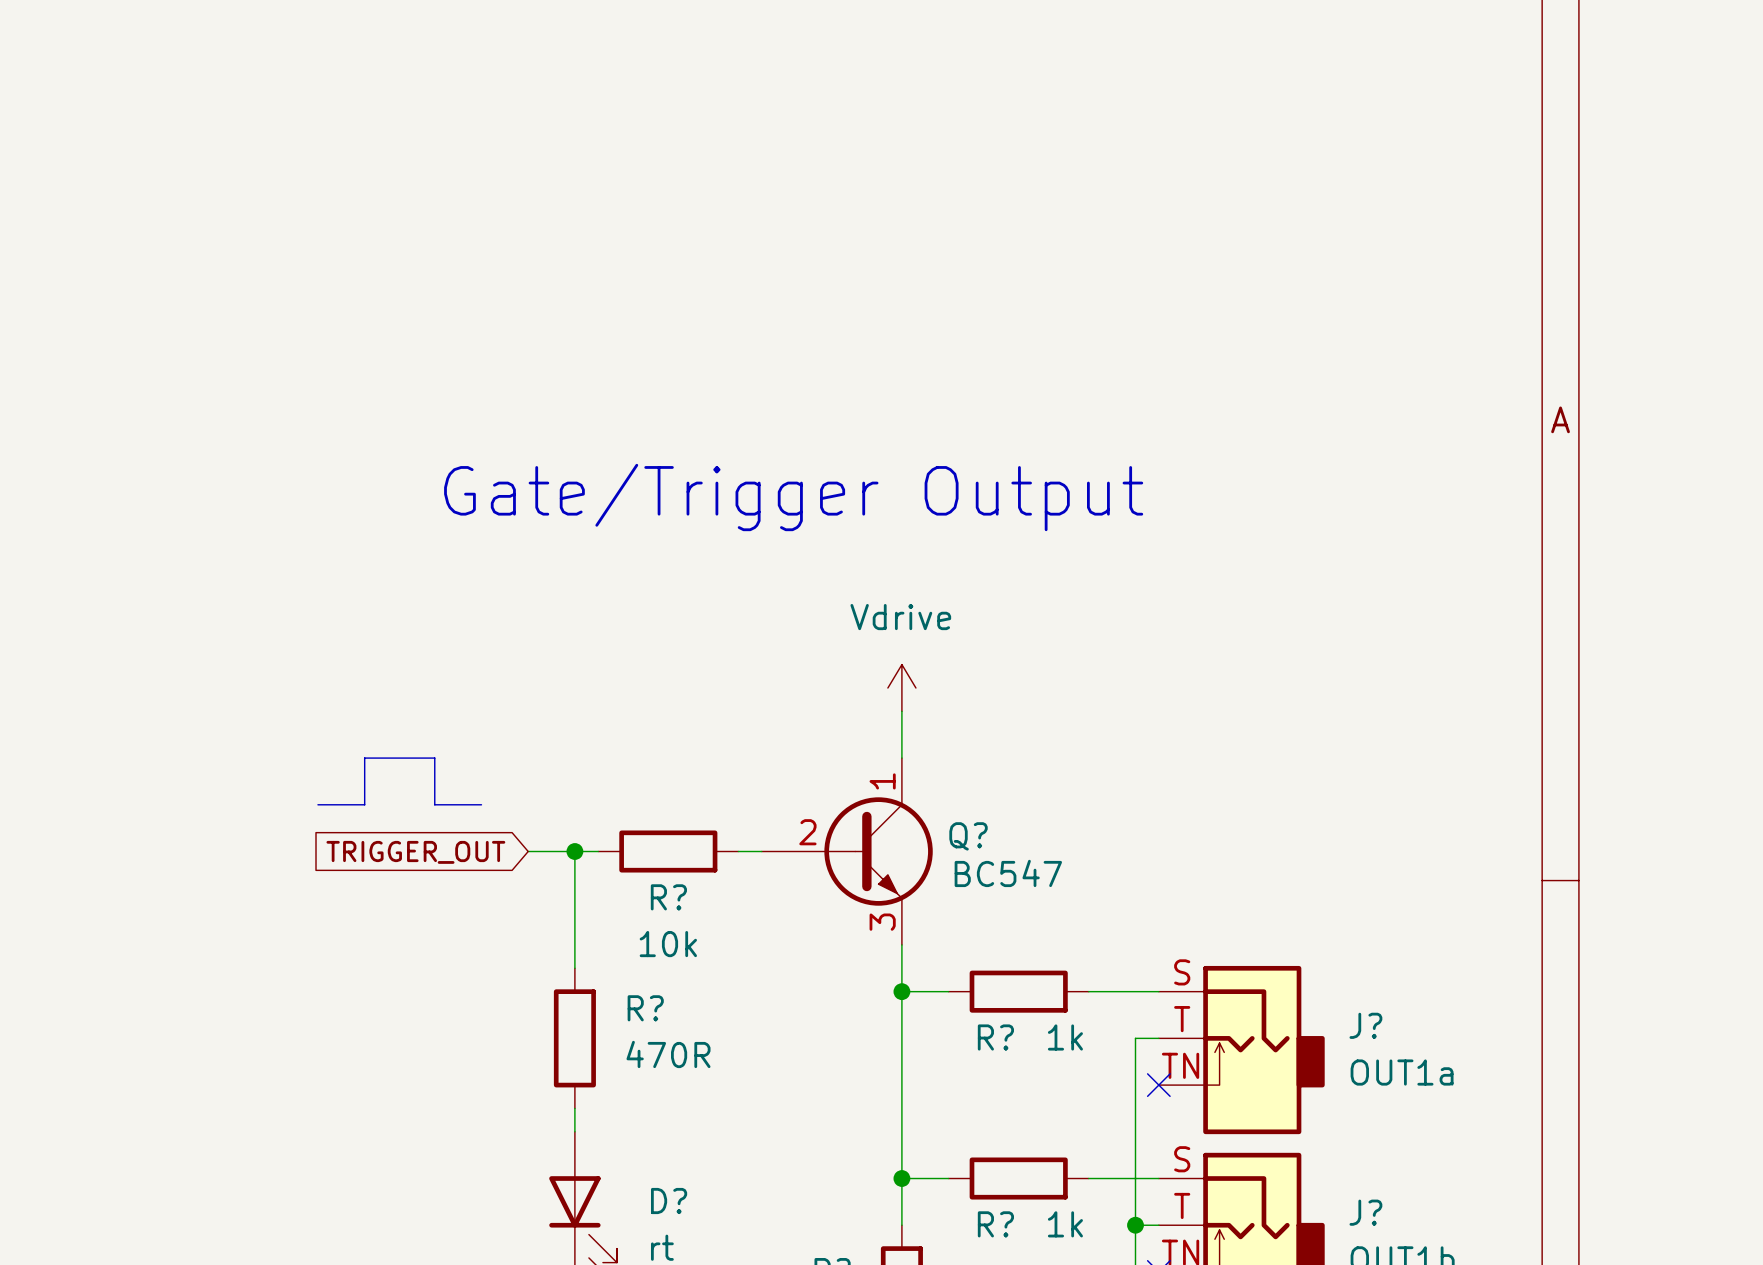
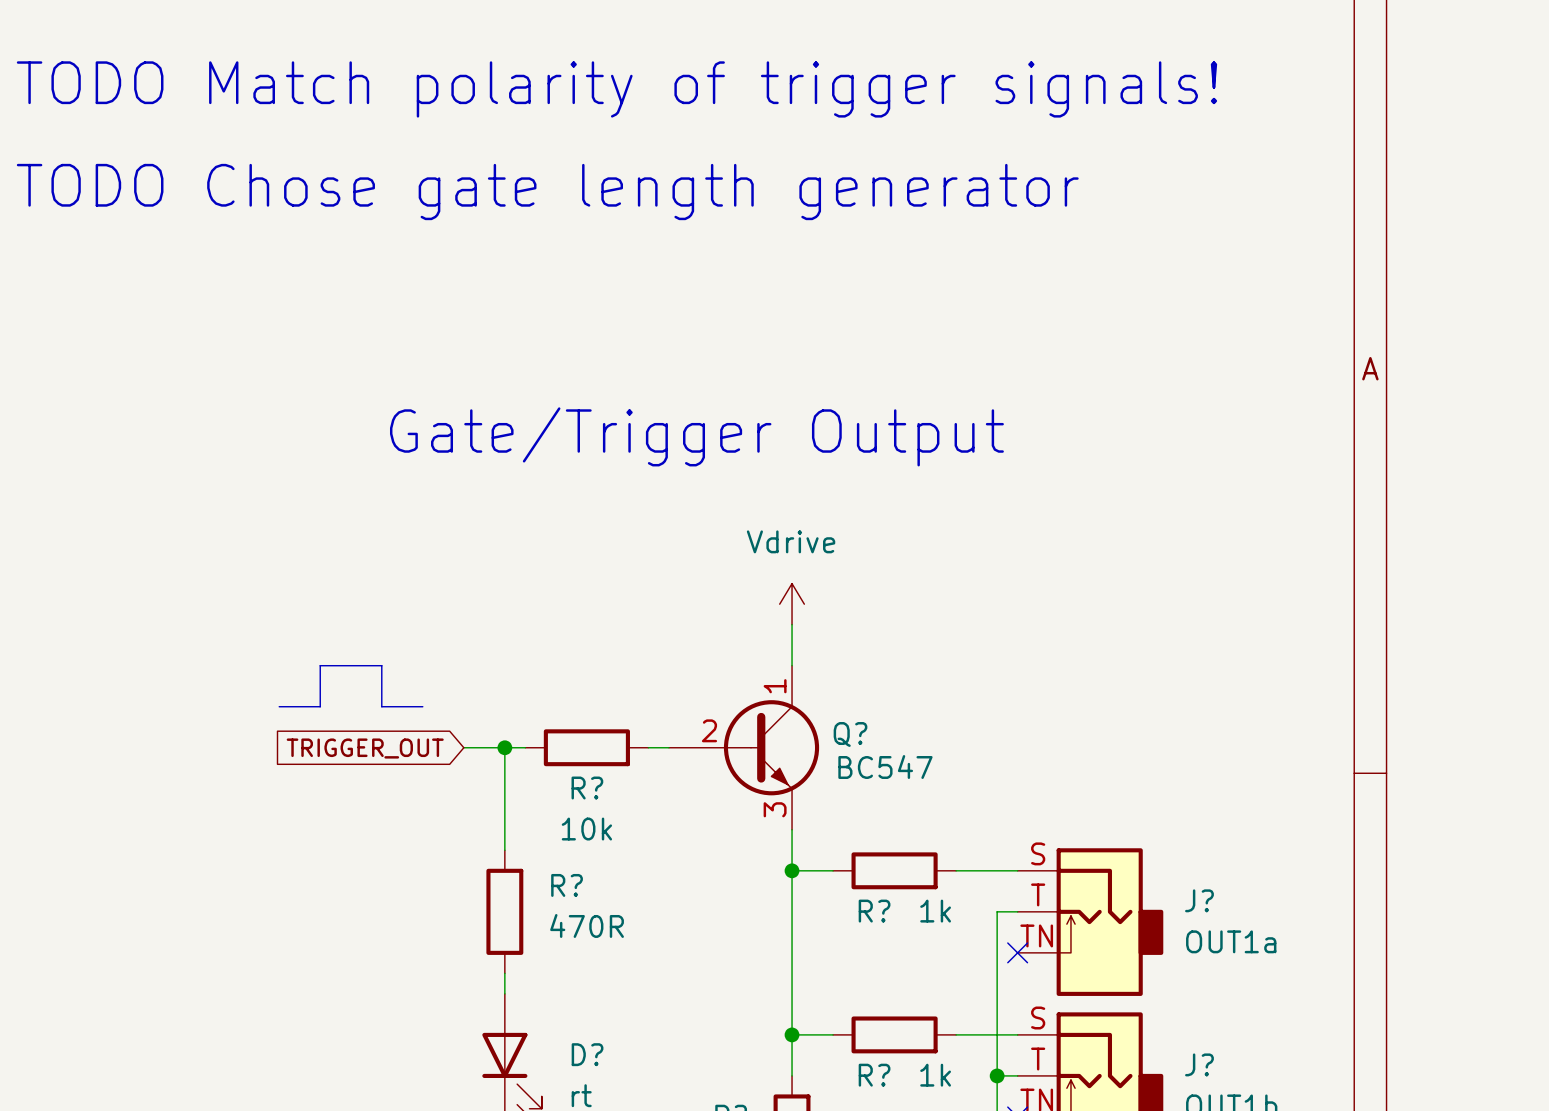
text: none -> TODO Match polarity of trigger signals! (616, 89)
text: none -> TODO Chose gate length generator (547, 192)

